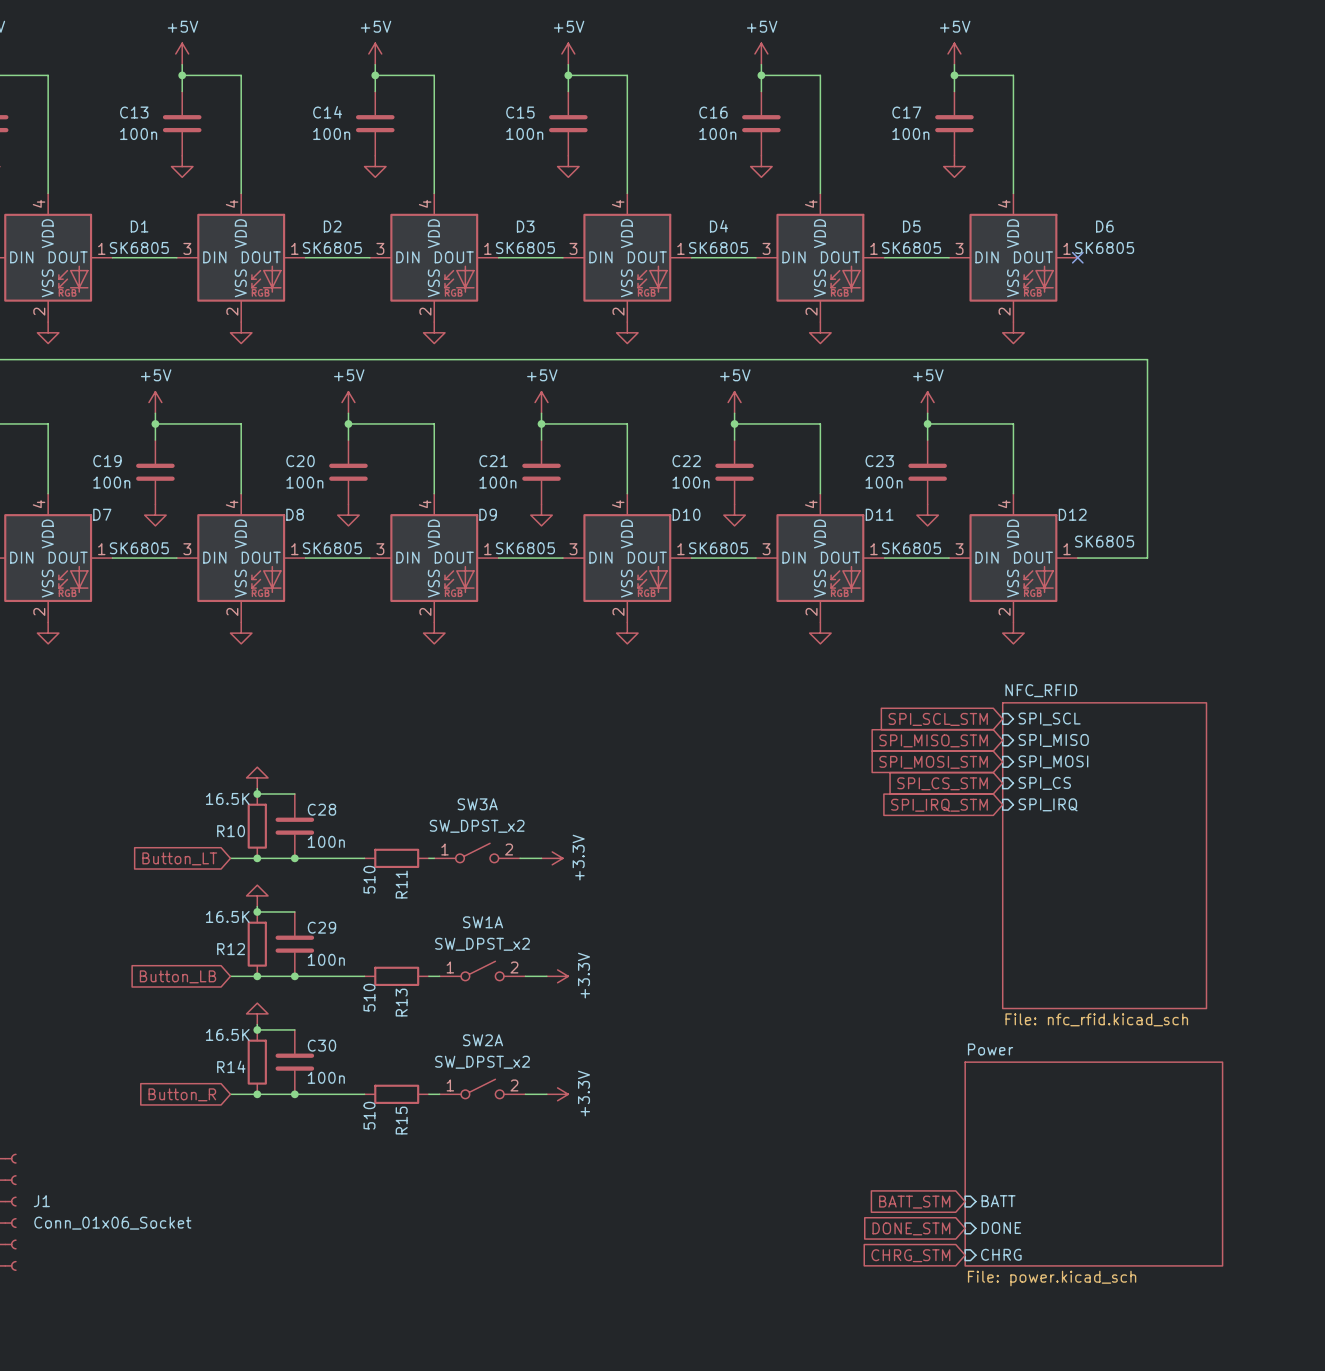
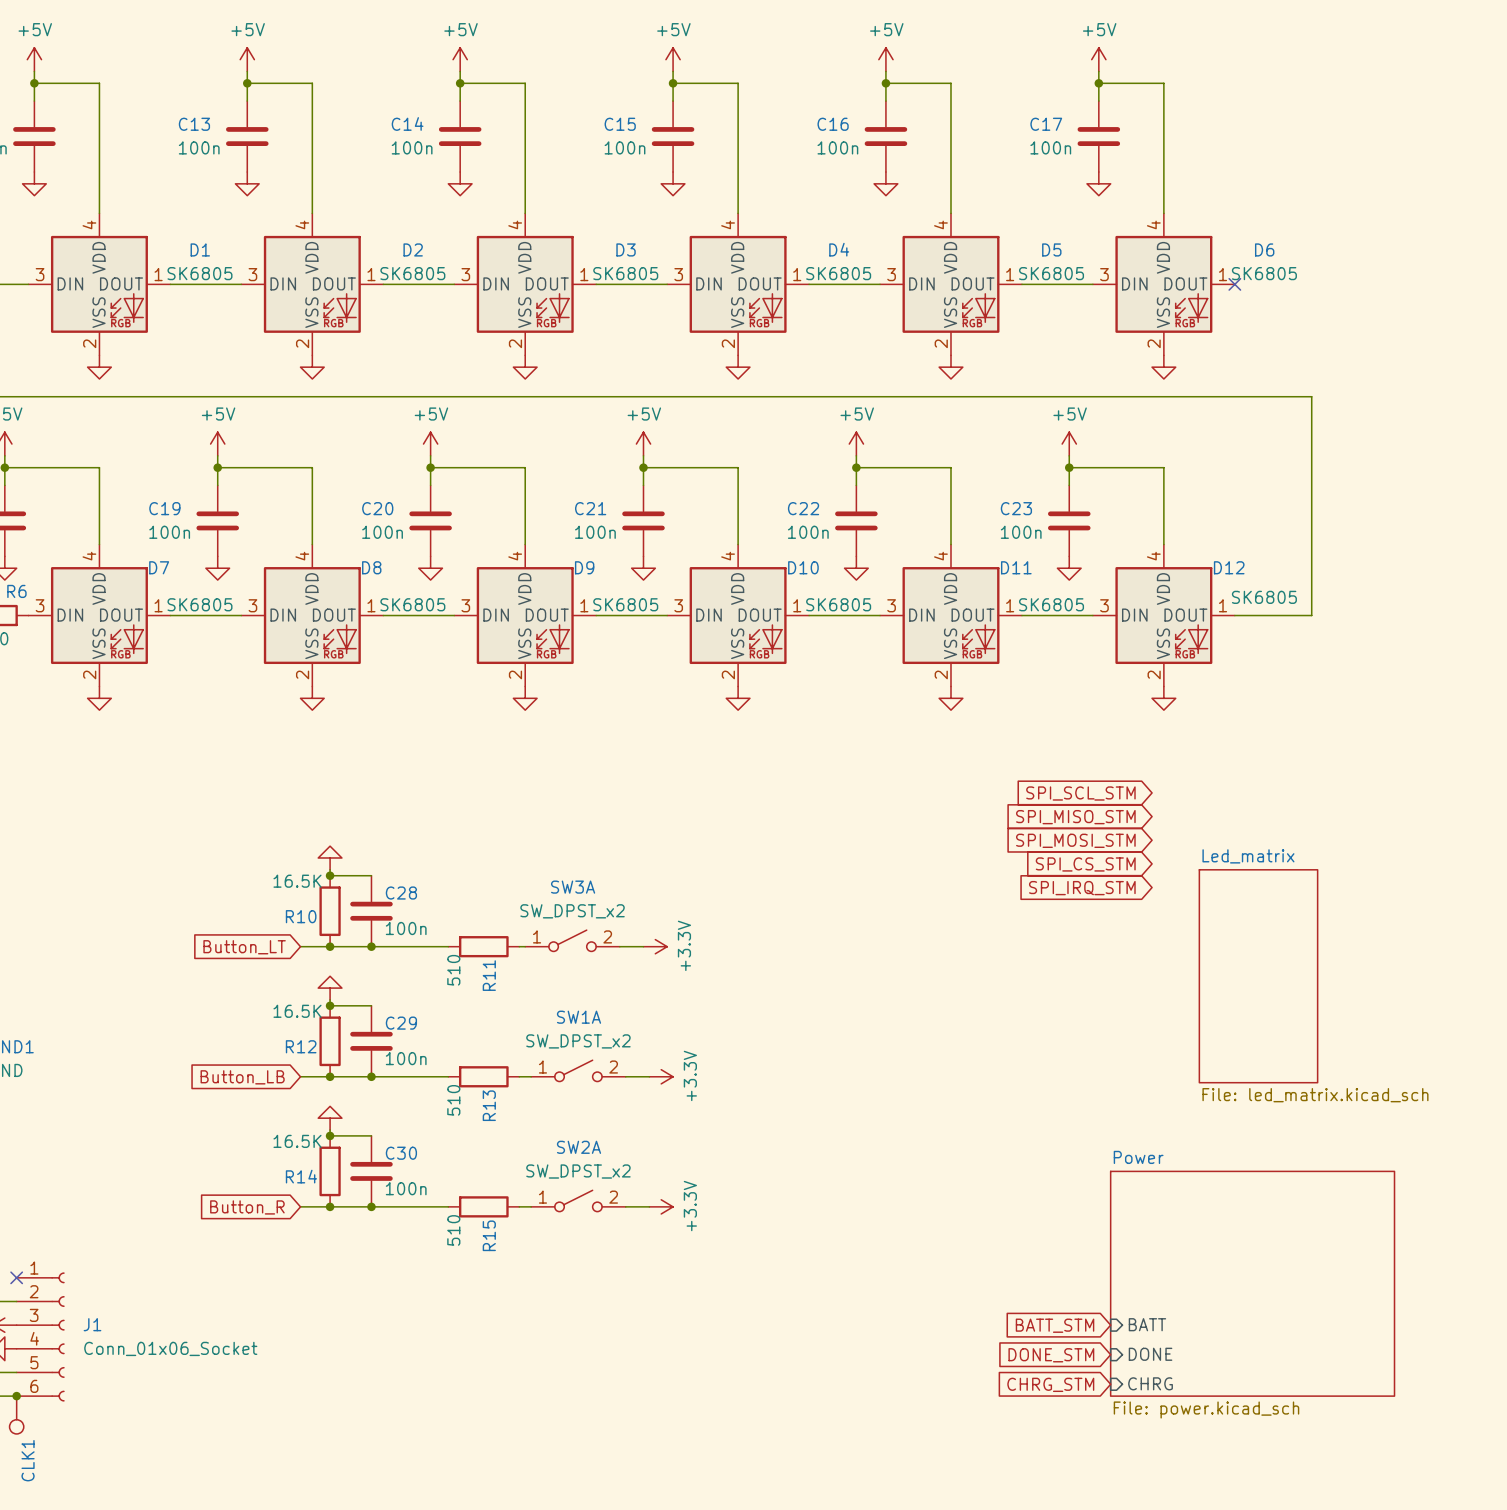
sheet pin: SPI_SCL (1049, 719) -> none
sheet pin: SPI_MISO (1053, 740) -> none
sheet pin: SPI_MOSI (1053, 761) -> none
sheet pin: SPI_CS (1044, 783) -> none
sheet pin: SPI_IRQ (1048, 804) -> none
sheet NFC_RFID: File: nfc_rfid.kicad_sch (1104, 855) -> none
sheet Led_matrix: none -> File: led_matrix.kicad_sch (1258, 976)

